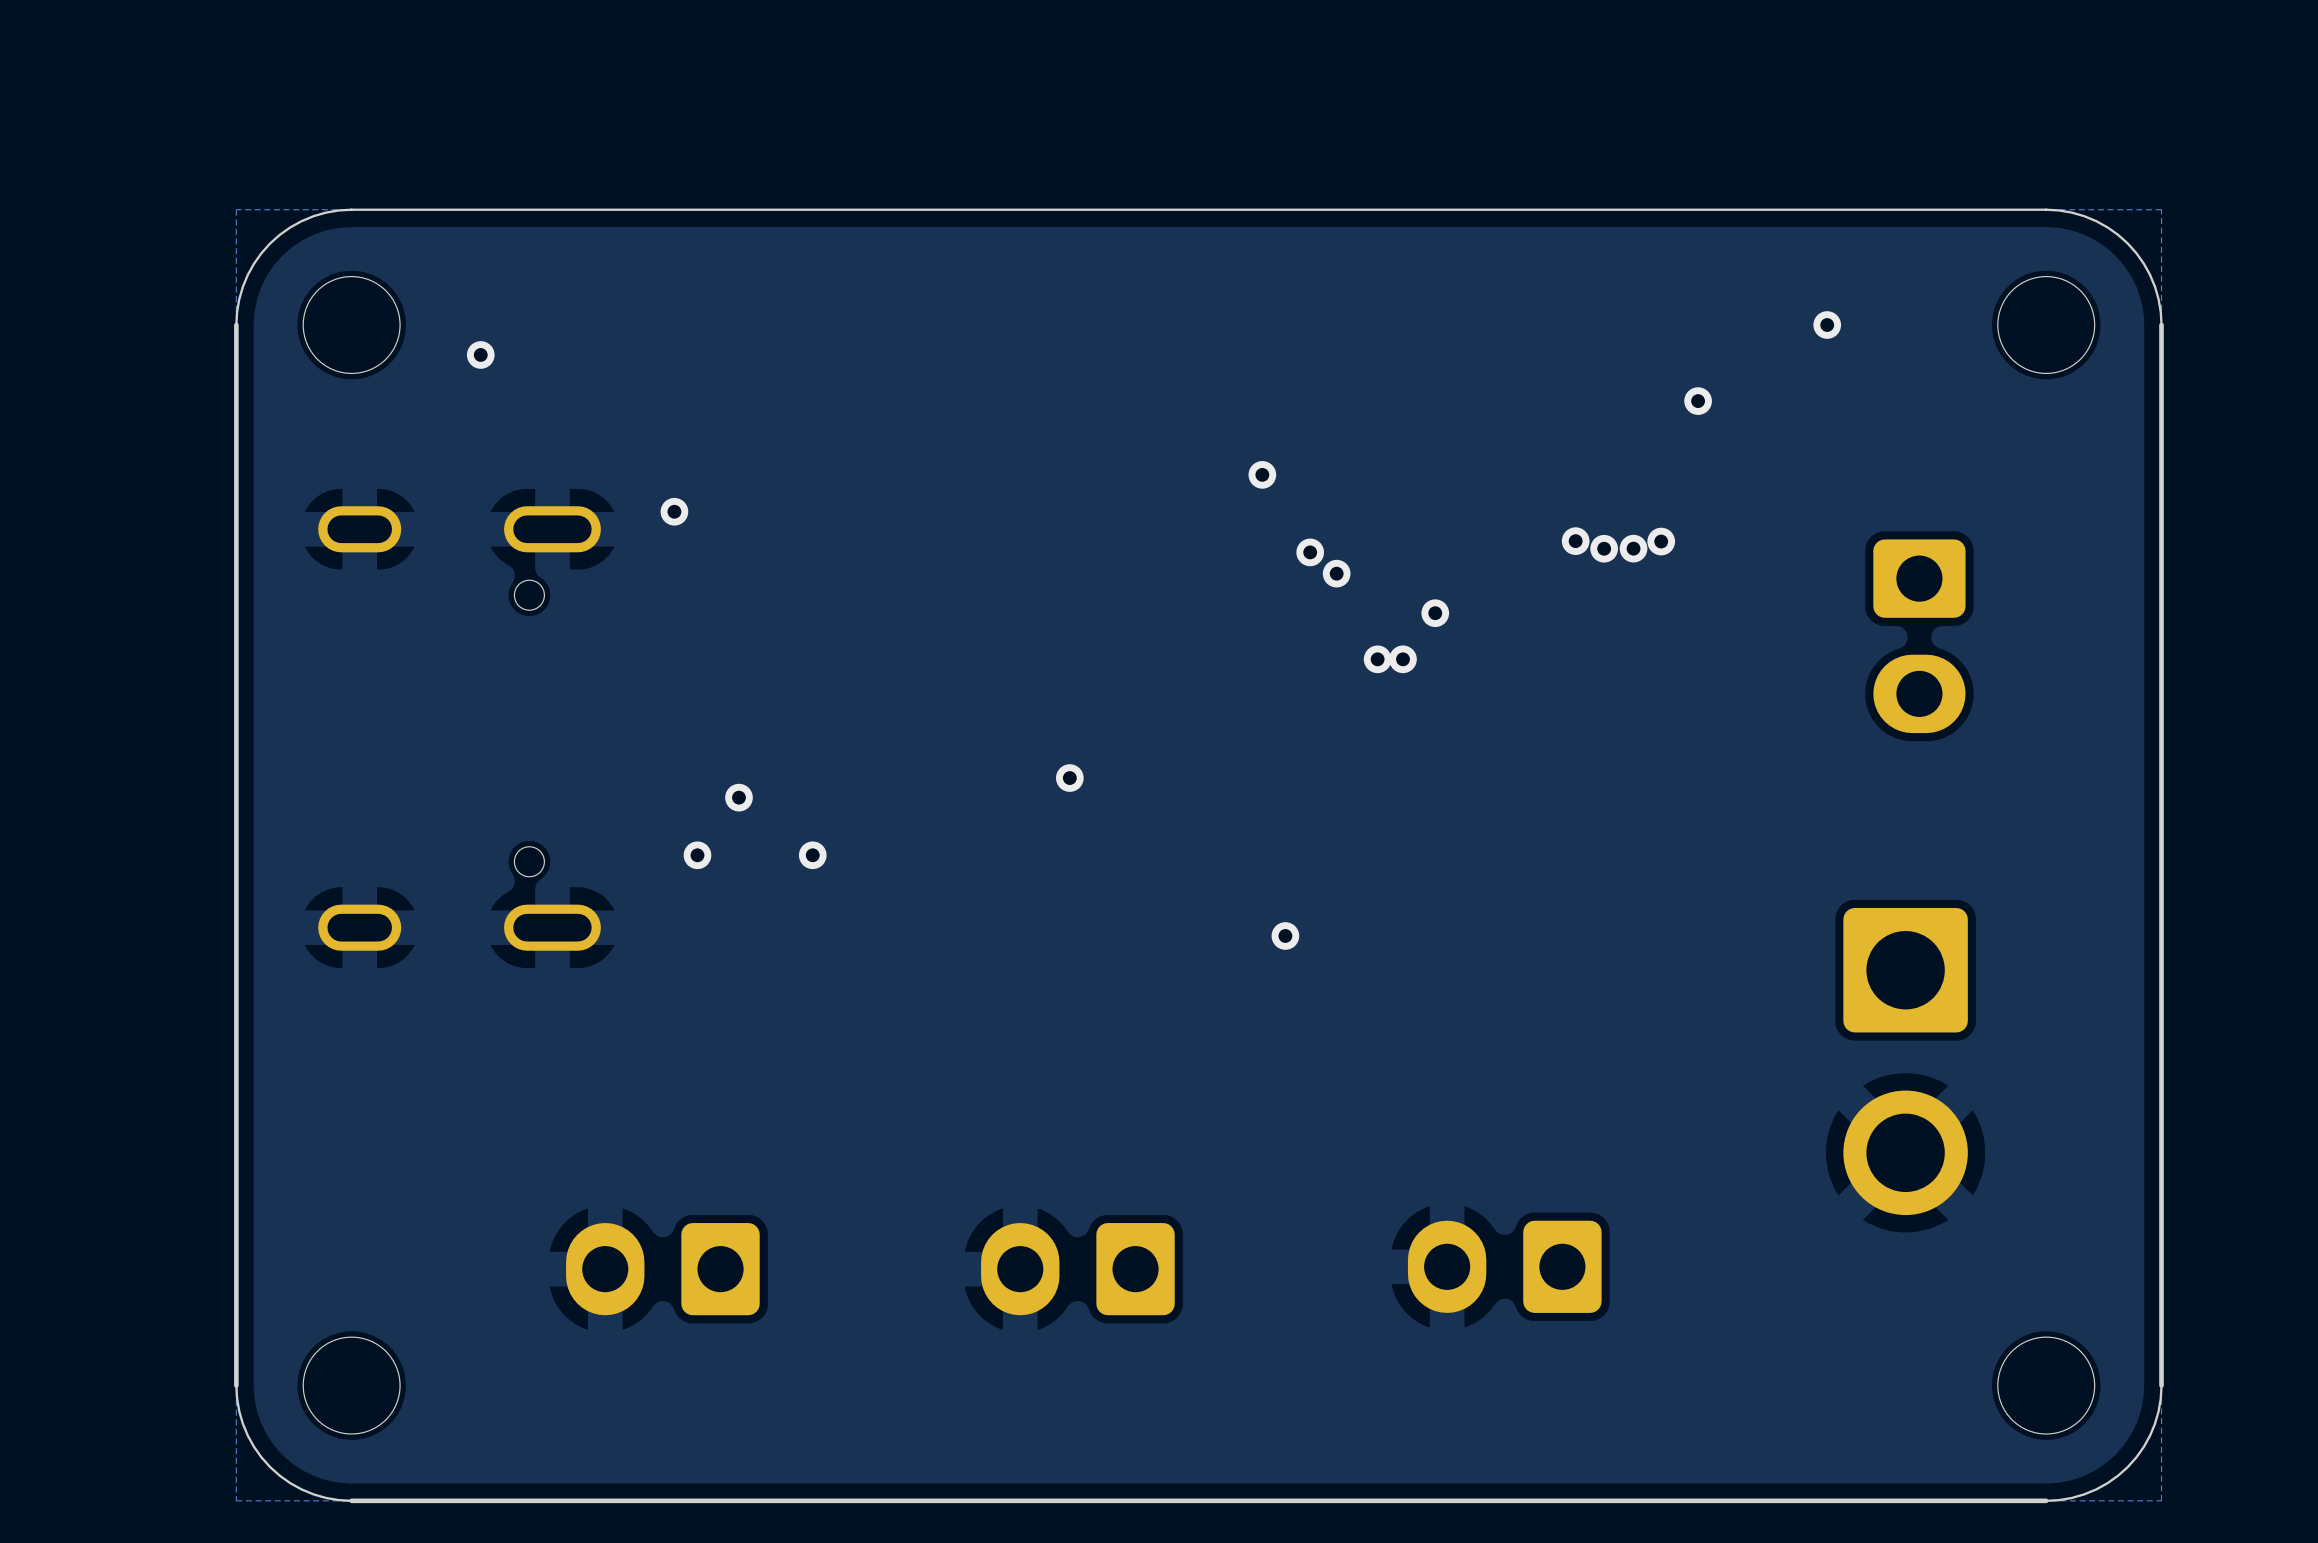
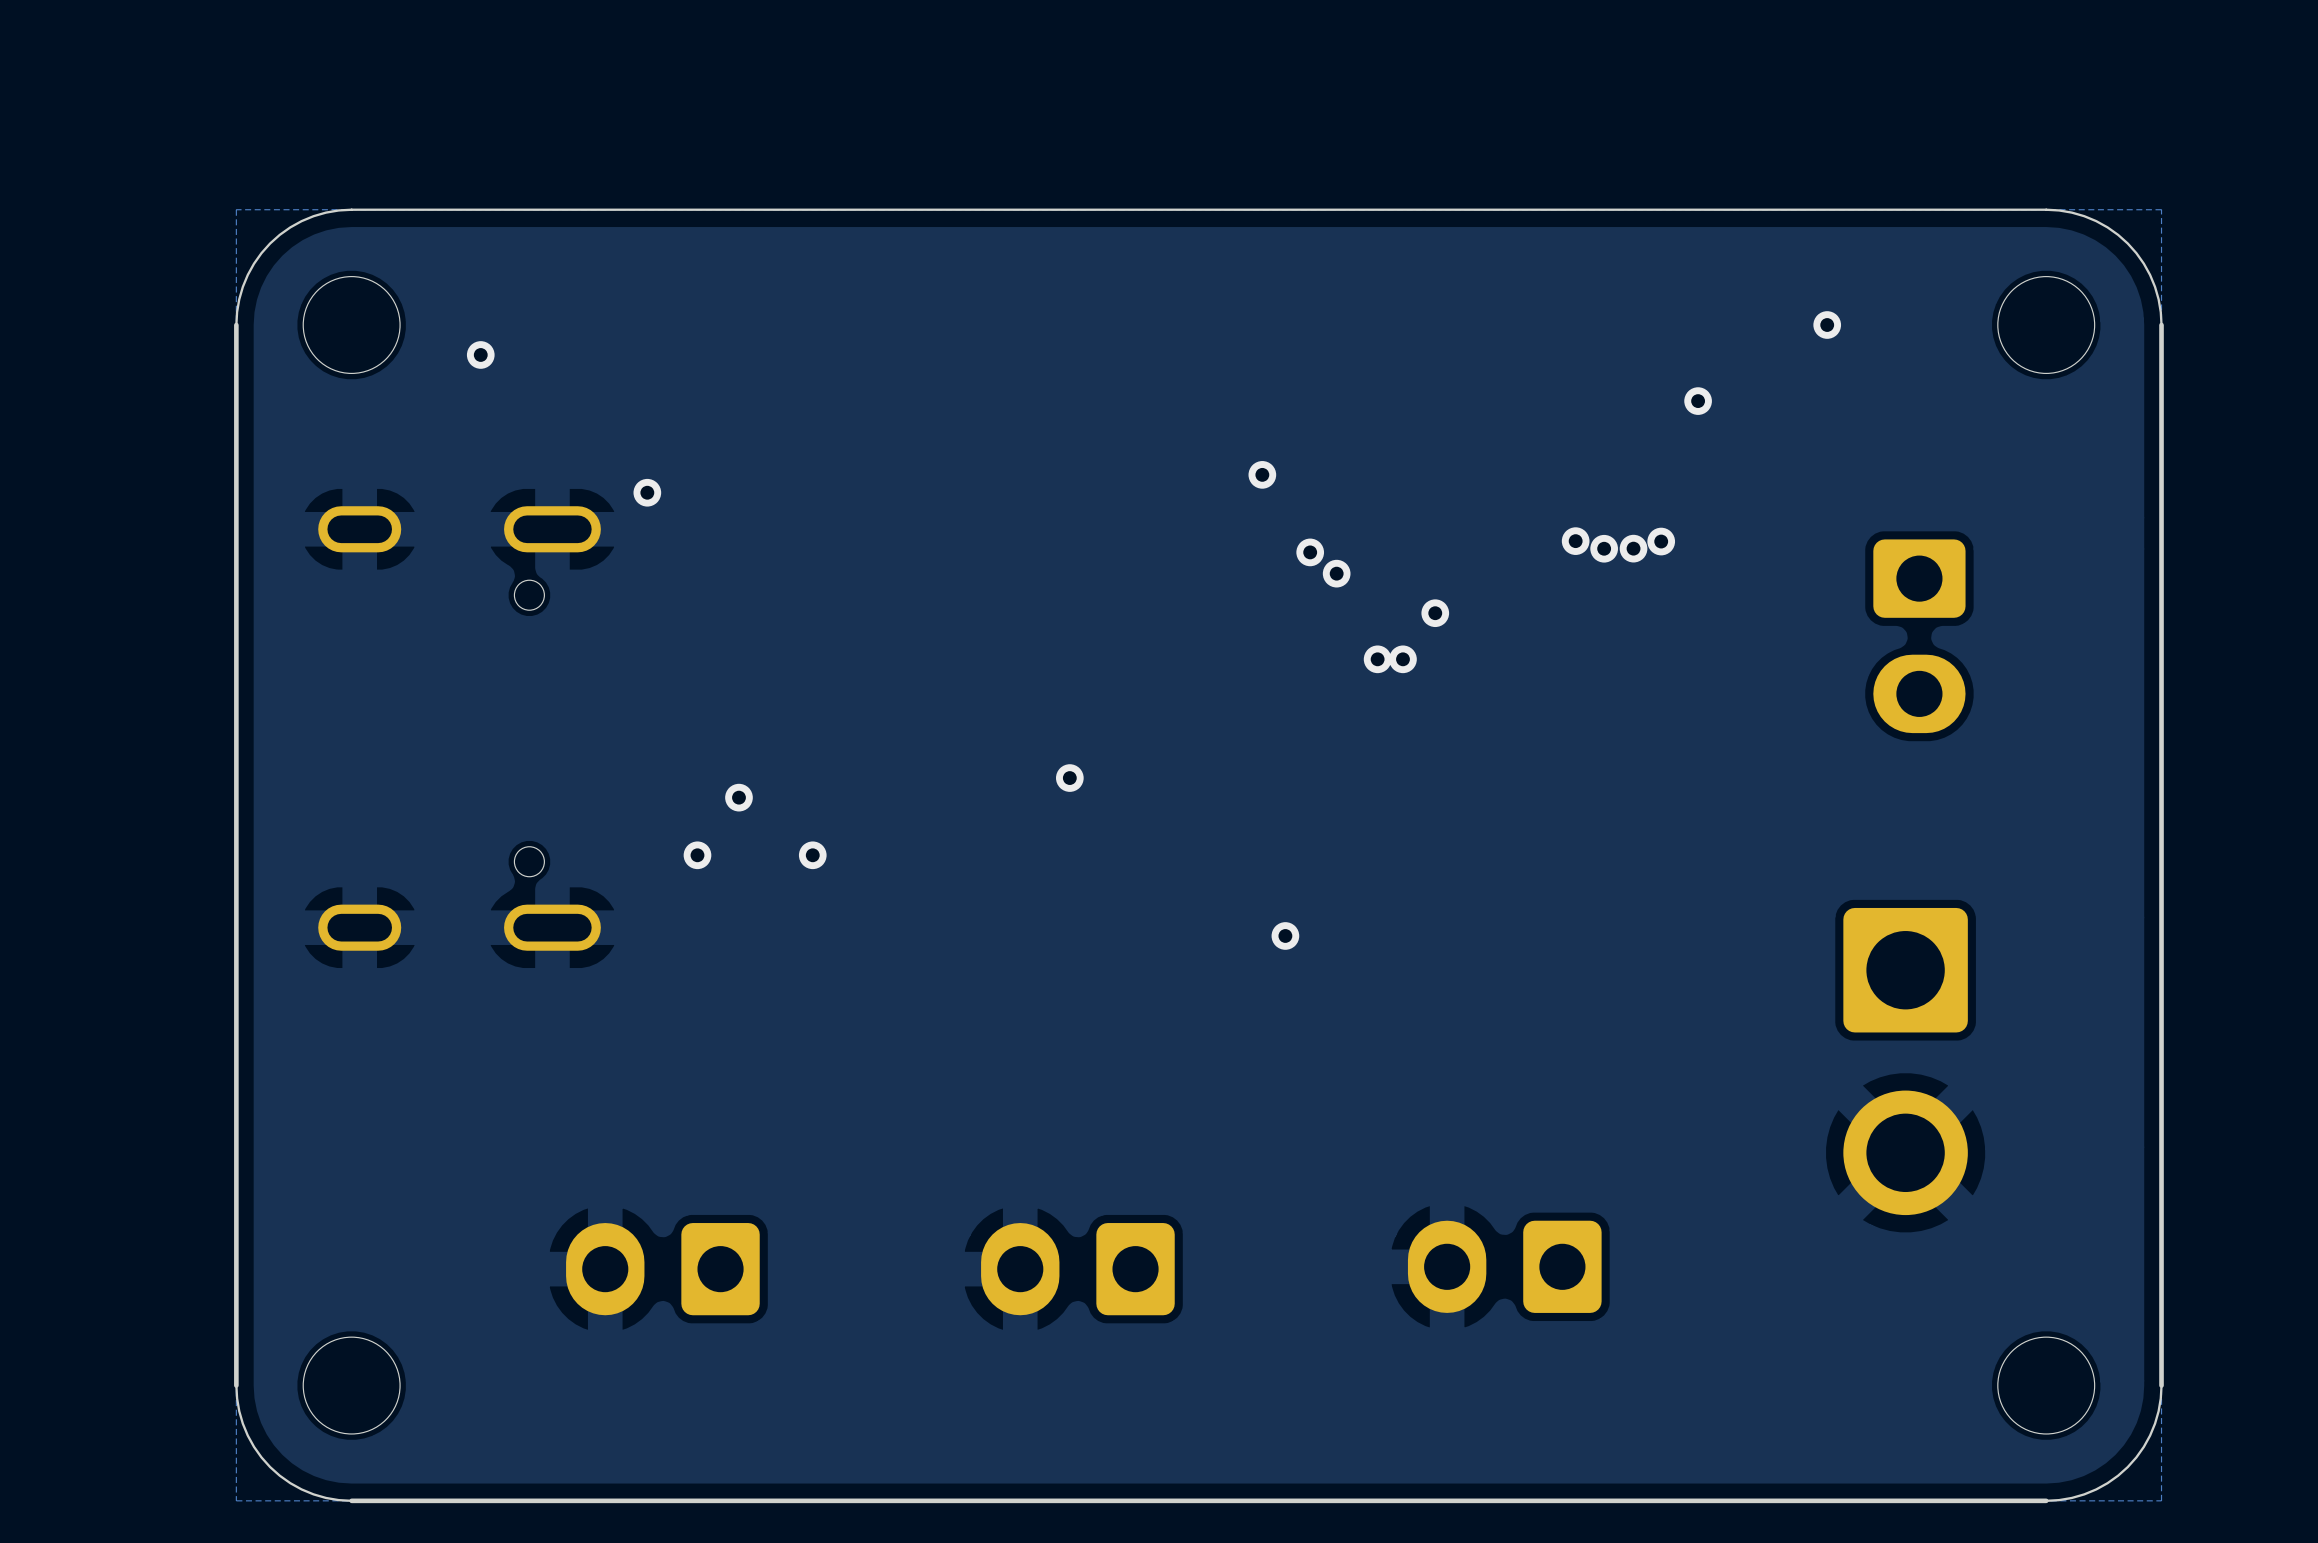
via position: (674, 511) -> (647, 492)

